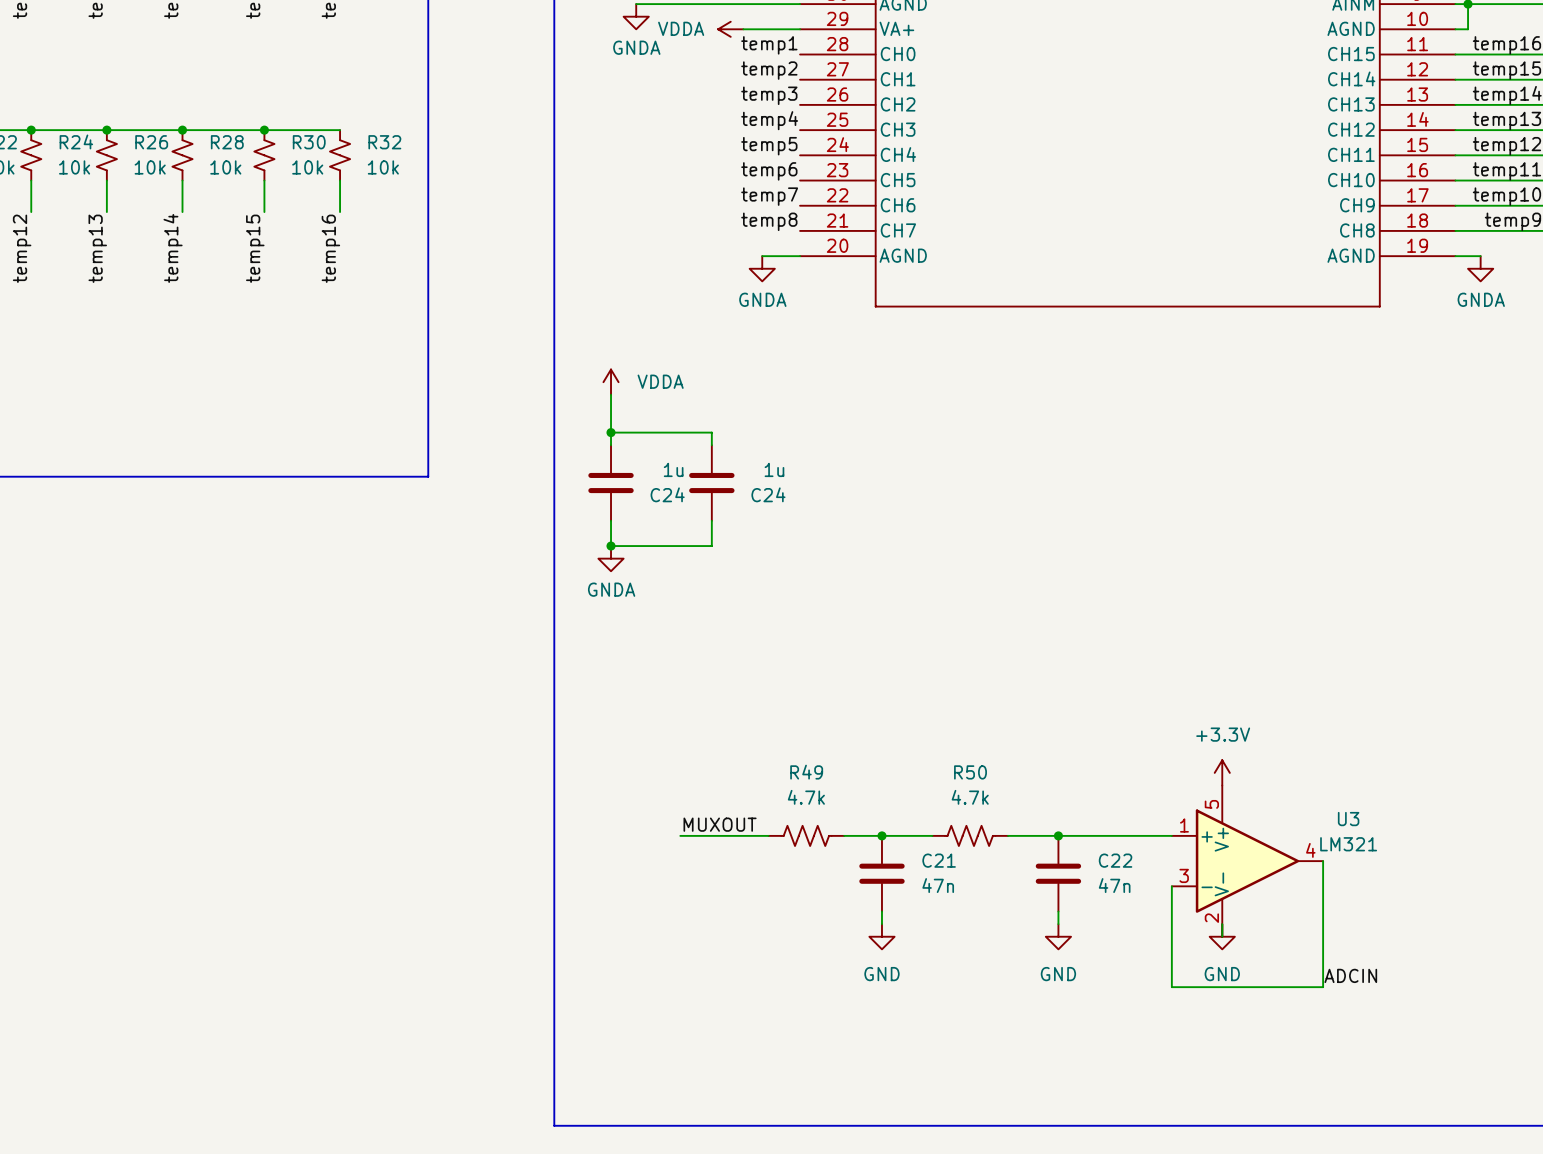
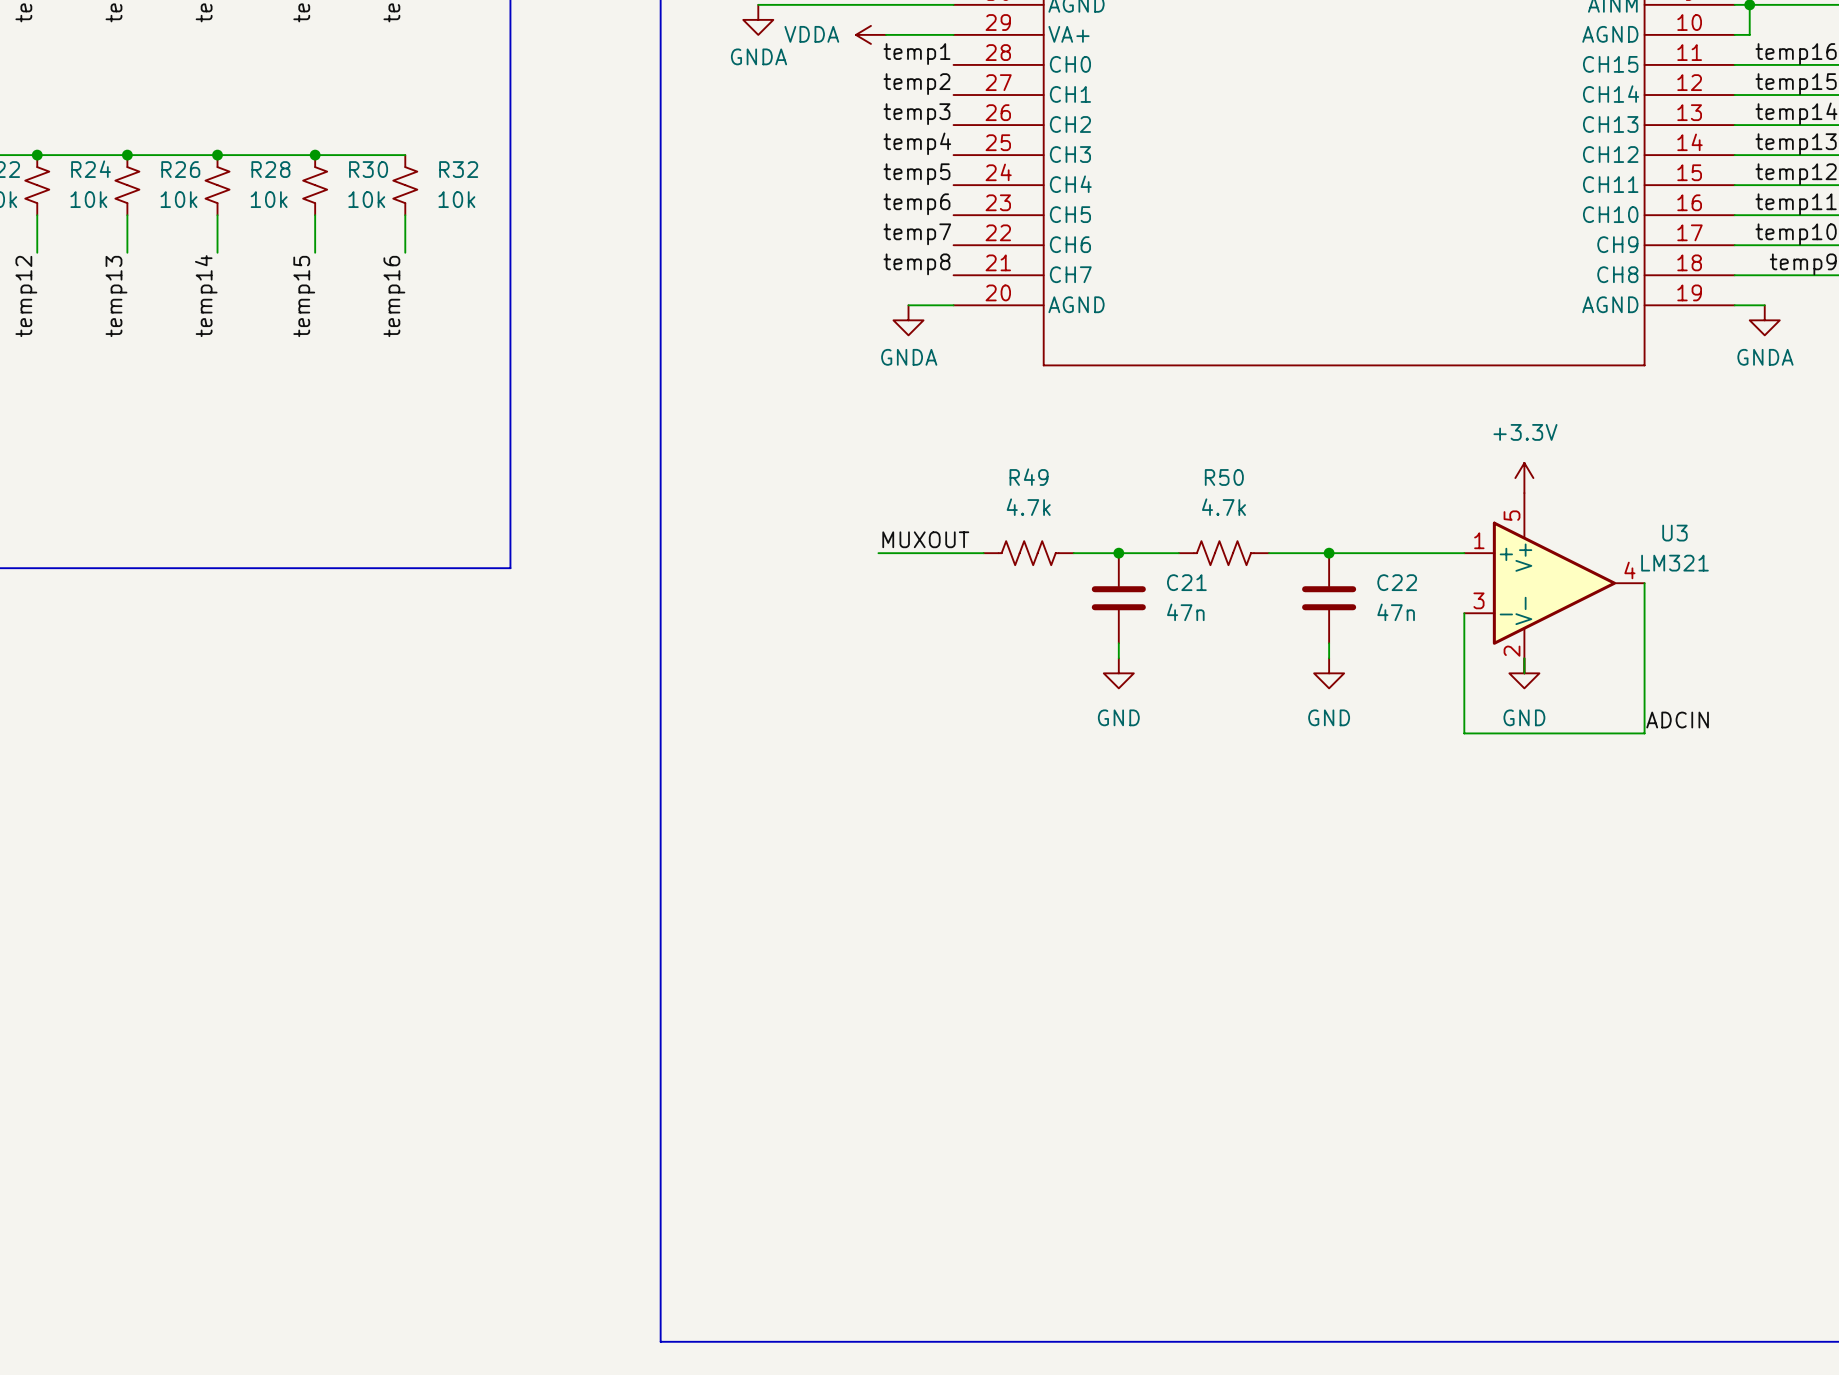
power symbol: VDDA (611, 382) -> none
wire: (611, 394) (611, 445) -> none
power symbol: none -> +3.3V (1524, 478)
wire: (611, 432) (711, 432) (711, 445) -> none
junction: (611, 432) -> none
label: none -> MUXOUT (925, 539)
wire: none -> (878, 553) (983, 553)
wire: none -> (1073, 553) (1178, 553)
junction: none -> (1118, 553)
wire: none -> (1269, 553) (1464, 553)
junction: none -> (1329, 553)
C24: 1u (611, 483) -> none
C24: 1u (711, 483) -> none
wire: none -> (1644, 583) (1644, 733) (1464, 733) (1464, 613)
wire: (611, 520) (611, 546) (711, 546) (711, 520) -> none
wire: none -> (1118, 643) (1118, 658)
wire: none -> (1329, 643) (1329, 658)
junction: (611, 546) -> none
wire: none -> (1524, 658) (1524, 673)
power symbol: GNDA (611, 558) -> none
power symbol: none -> GND (1118, 673)
power symbol: none -> GND (1329, 673)
power symbol: none -> GND (1524, 673)
label: none -> ADCIN (1677, 720)
power symbol: +3.3V (1222, 772) -> none
label: MUXOUT (720, 824) -> none
wire: (680, 835) (768, 835) -> none
R49 position: (806, 835) -> (1028, 553)
wire: (844, 835) (932, 835) -> none
junction: (881, 835) -> none
R50 position: (970, 835) -> (1223, 553)
wire: (1008, 835) (1171, 835) -> none
junction: (1058, 835) -> none
U3 position: (1247, 861) -> (1554, 583)
wire: (1323, 861) (1323, 987) (1171, 987) (1171, 886) -> none
C21 position: (881, 873) -> (1118, 598)
C22 position: (1058, 873) -> (1329, 598)
wire: (881, 911) (881, 924) -> none
wire: (1058, 911) (1058, 924) -> none
wire: (1222, 924) (1222, 936) -> none
power symbol: GND (881, 936) -> none
power symbol: GND (1058, 936) -> none
power symbol: GND (1222, 936) -> none
label: ADCIN (1350, 975) -> none

